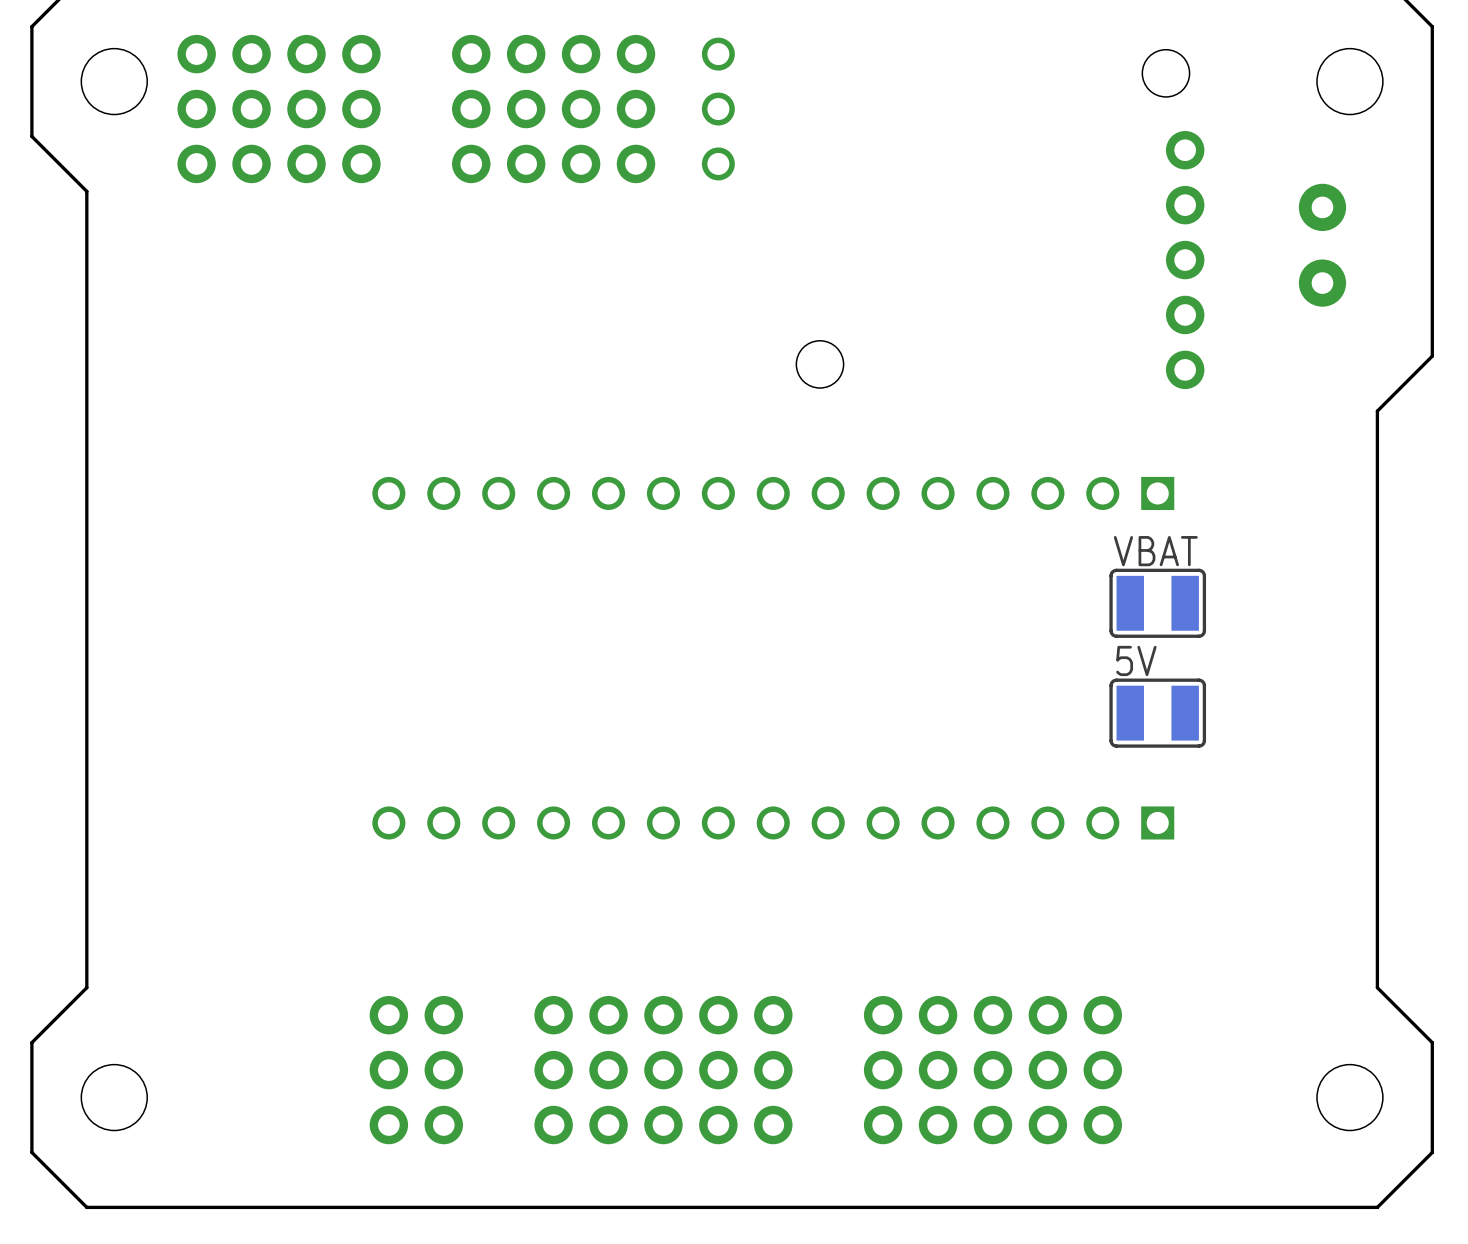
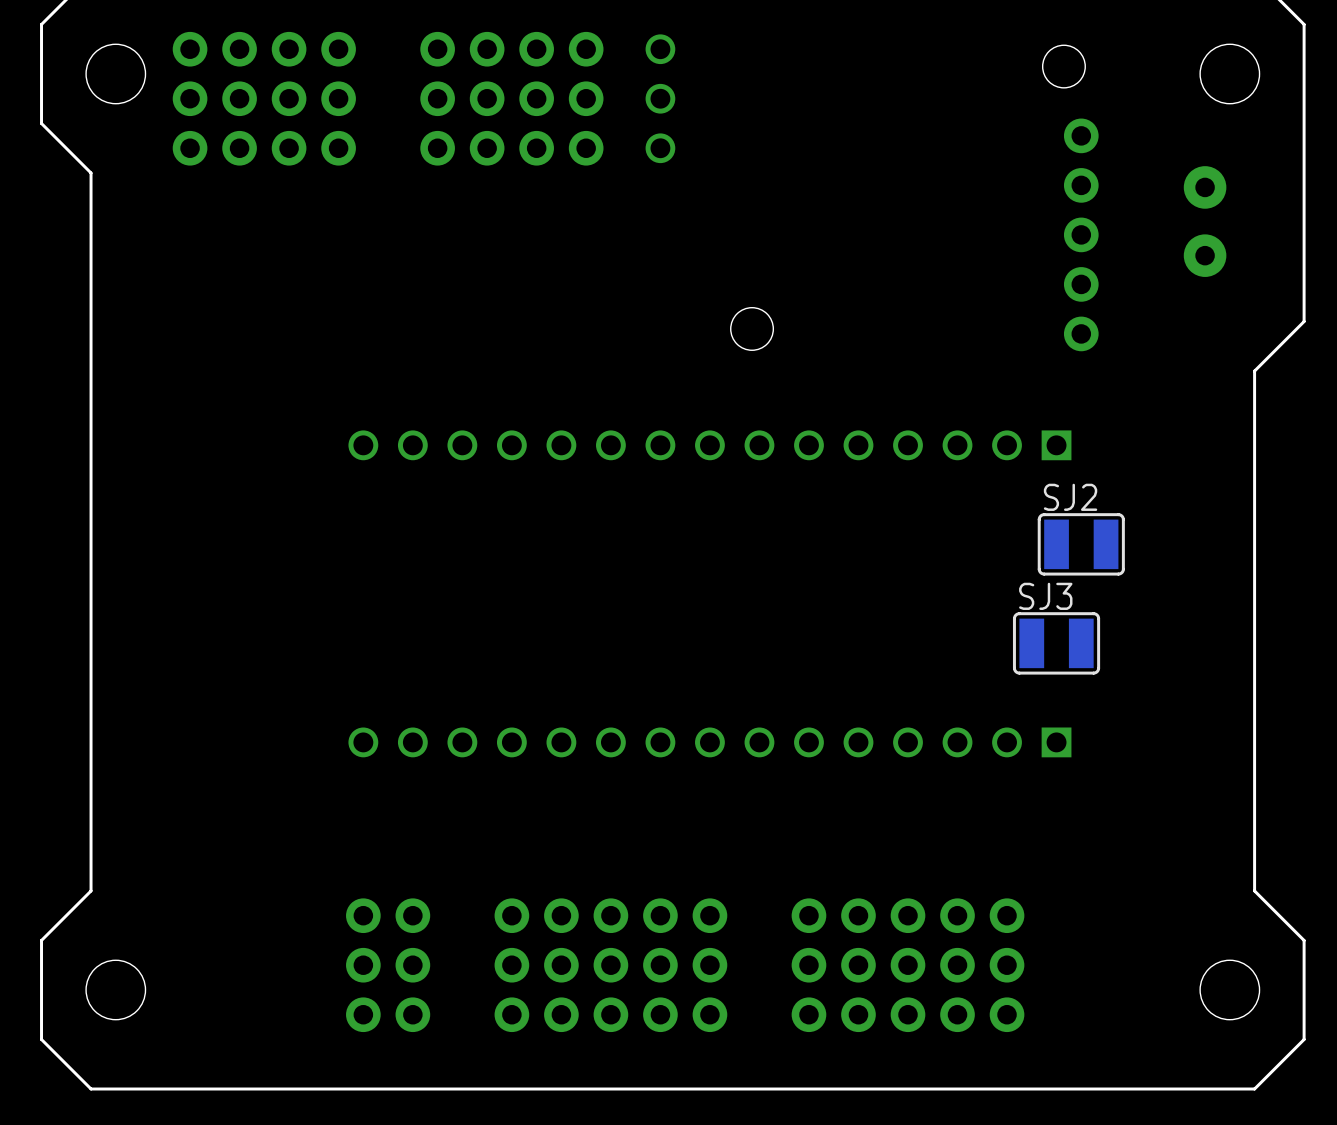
VBAT: (1157, 603) -> none
SJ2: none -> (1081, 544)
5V name: 5V (1136, 660) -> SJ3 (1045, 596)

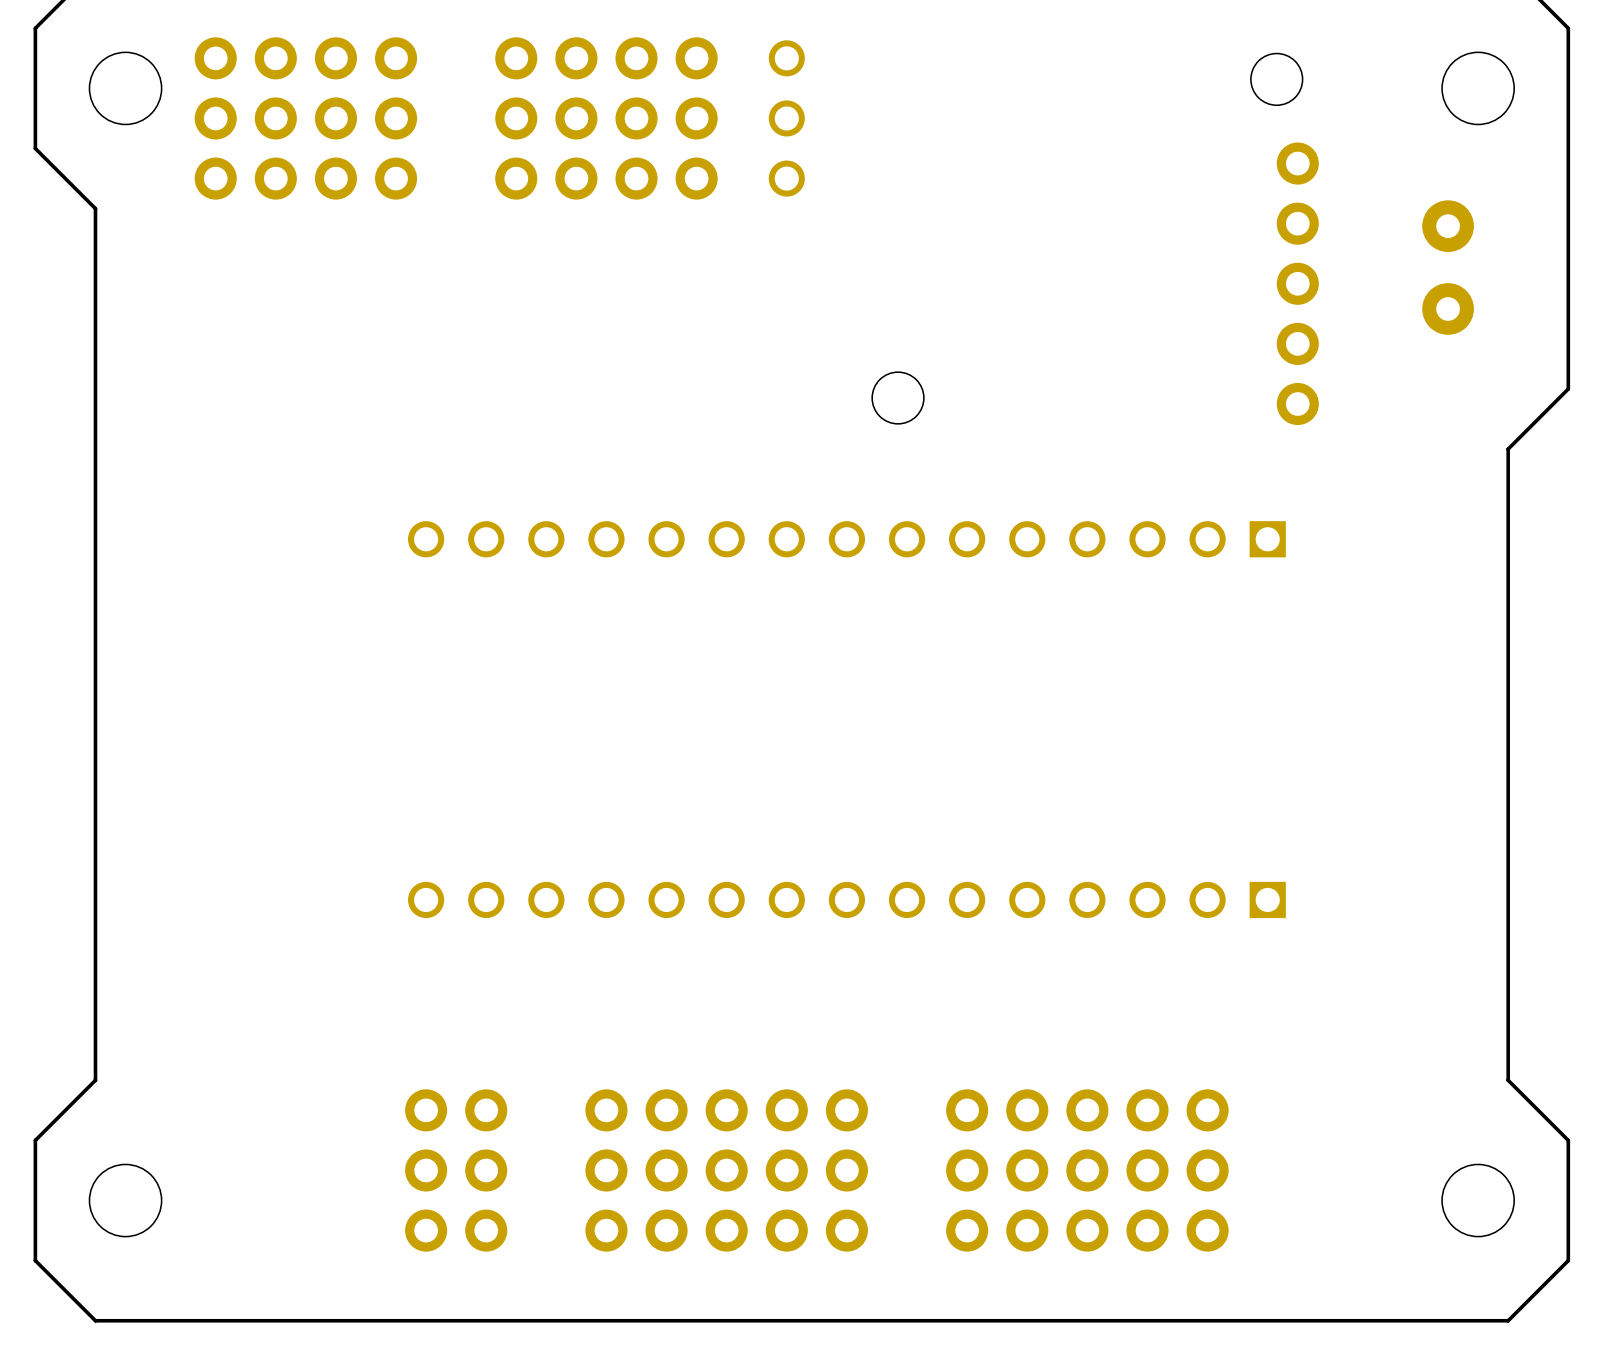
SJ2: (1081, 544) -> none
SJ3: (1056, 643) -> none

